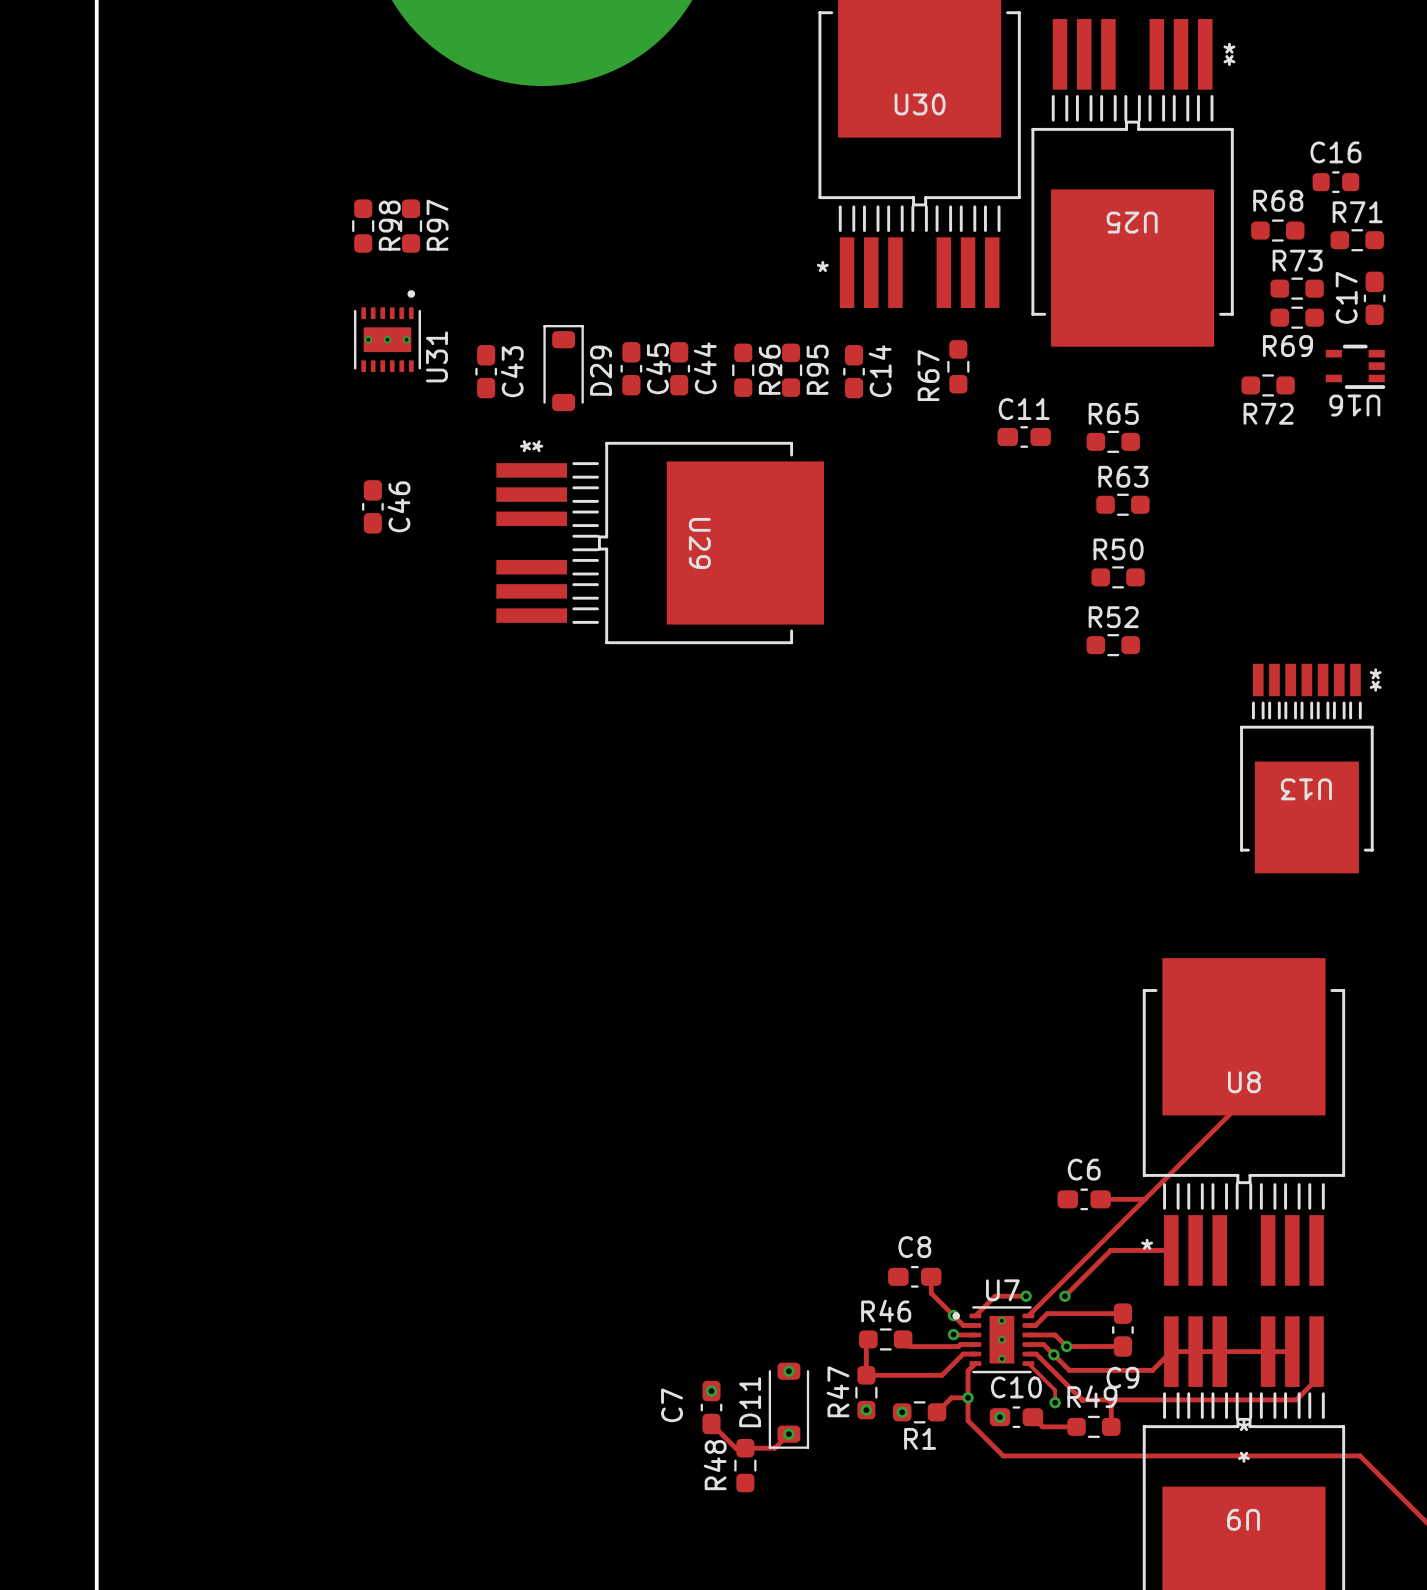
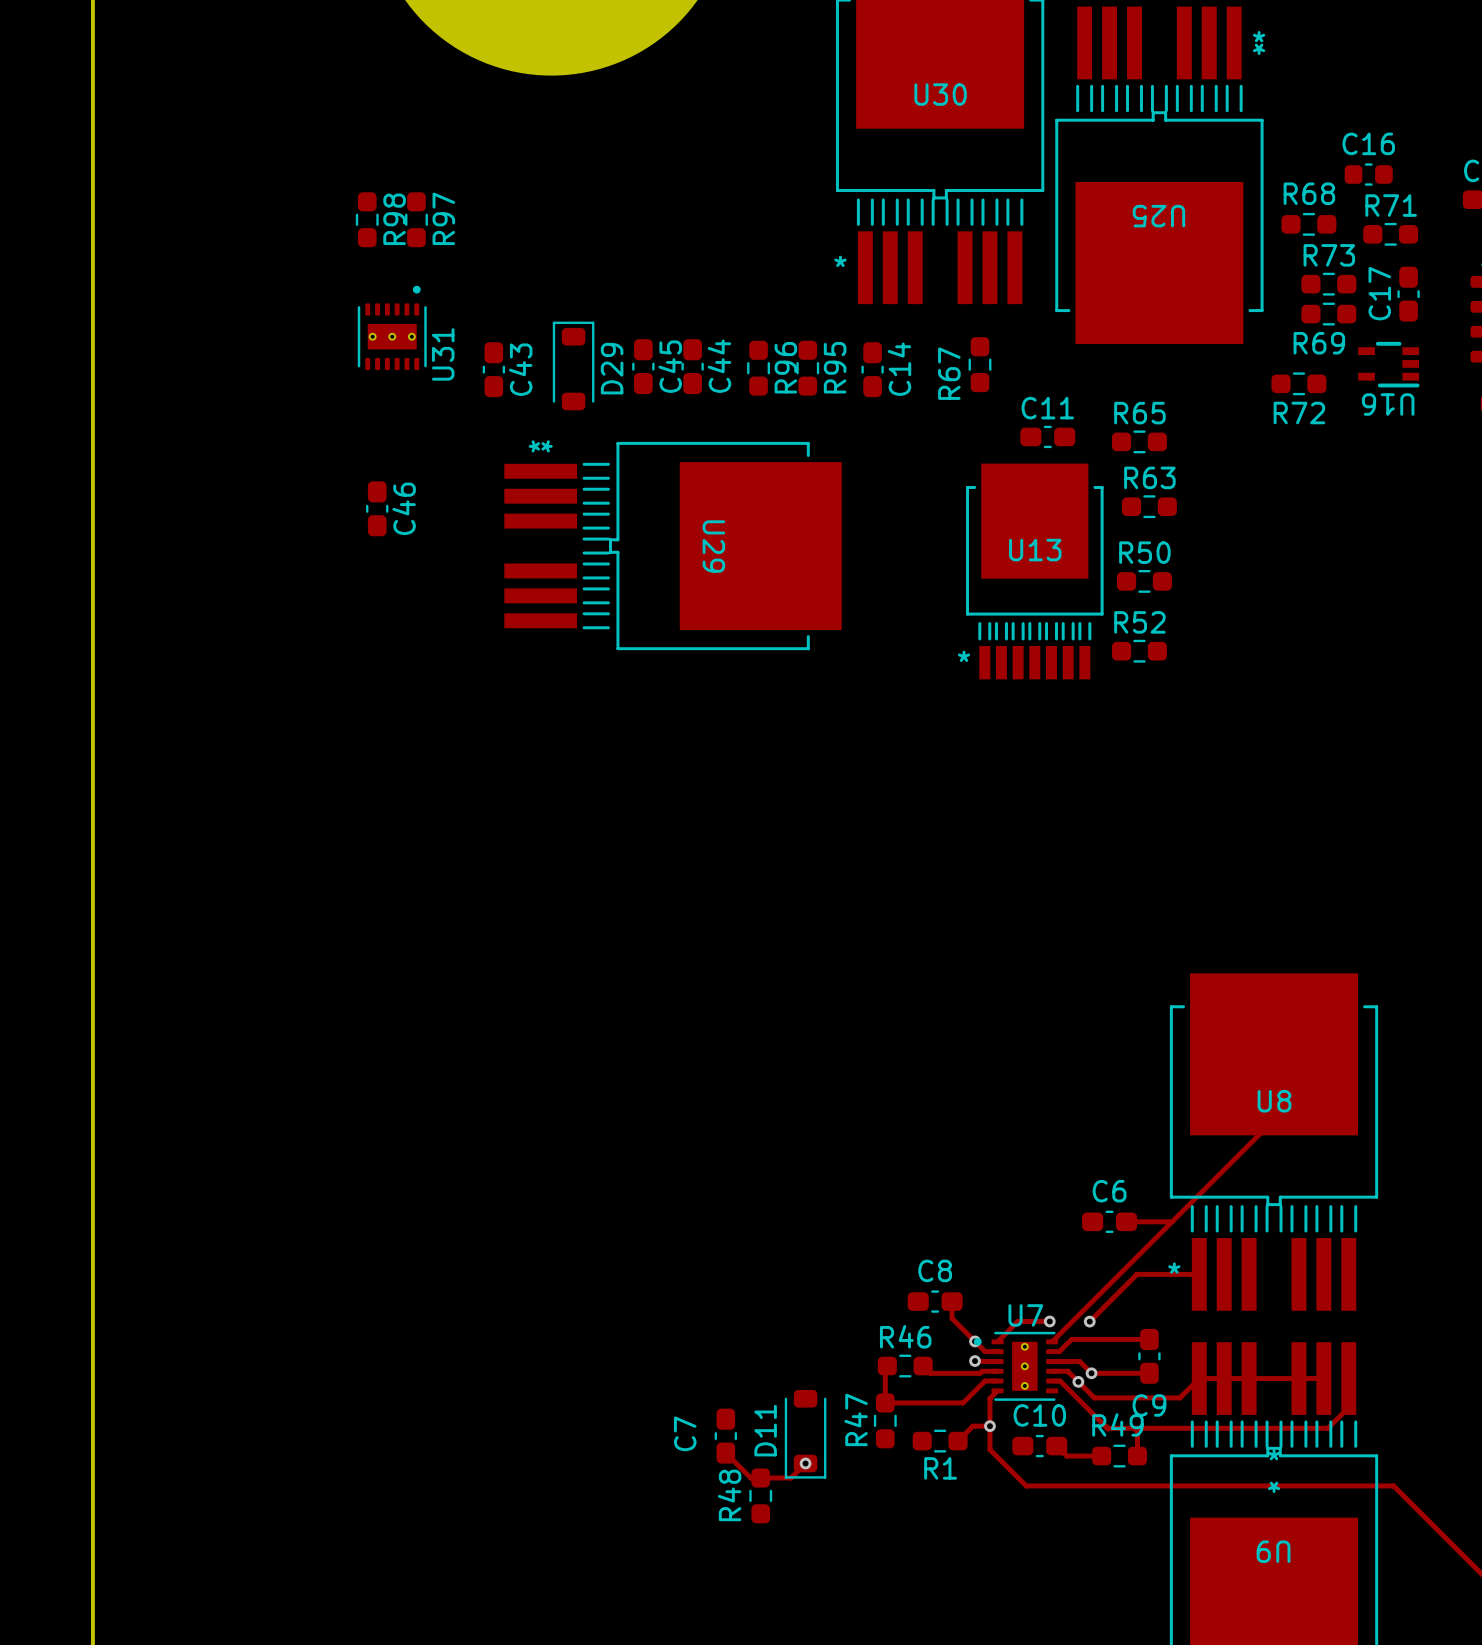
U13 rotation: 0° (1306, 768) -> 180° (1034, 571)
U13 position: (1306, 768) -> (1034, 571)
track: (1028, 1363) (1055, 1390) (1055, 1402) -> none
via: (788, 1371) -> none
via: (711, 1391) -> none
via: (1055, 1402) -> none
via: (866, 1410) -> none
via: (902, 1412) -> none
via: (1000, 1417) -> none

